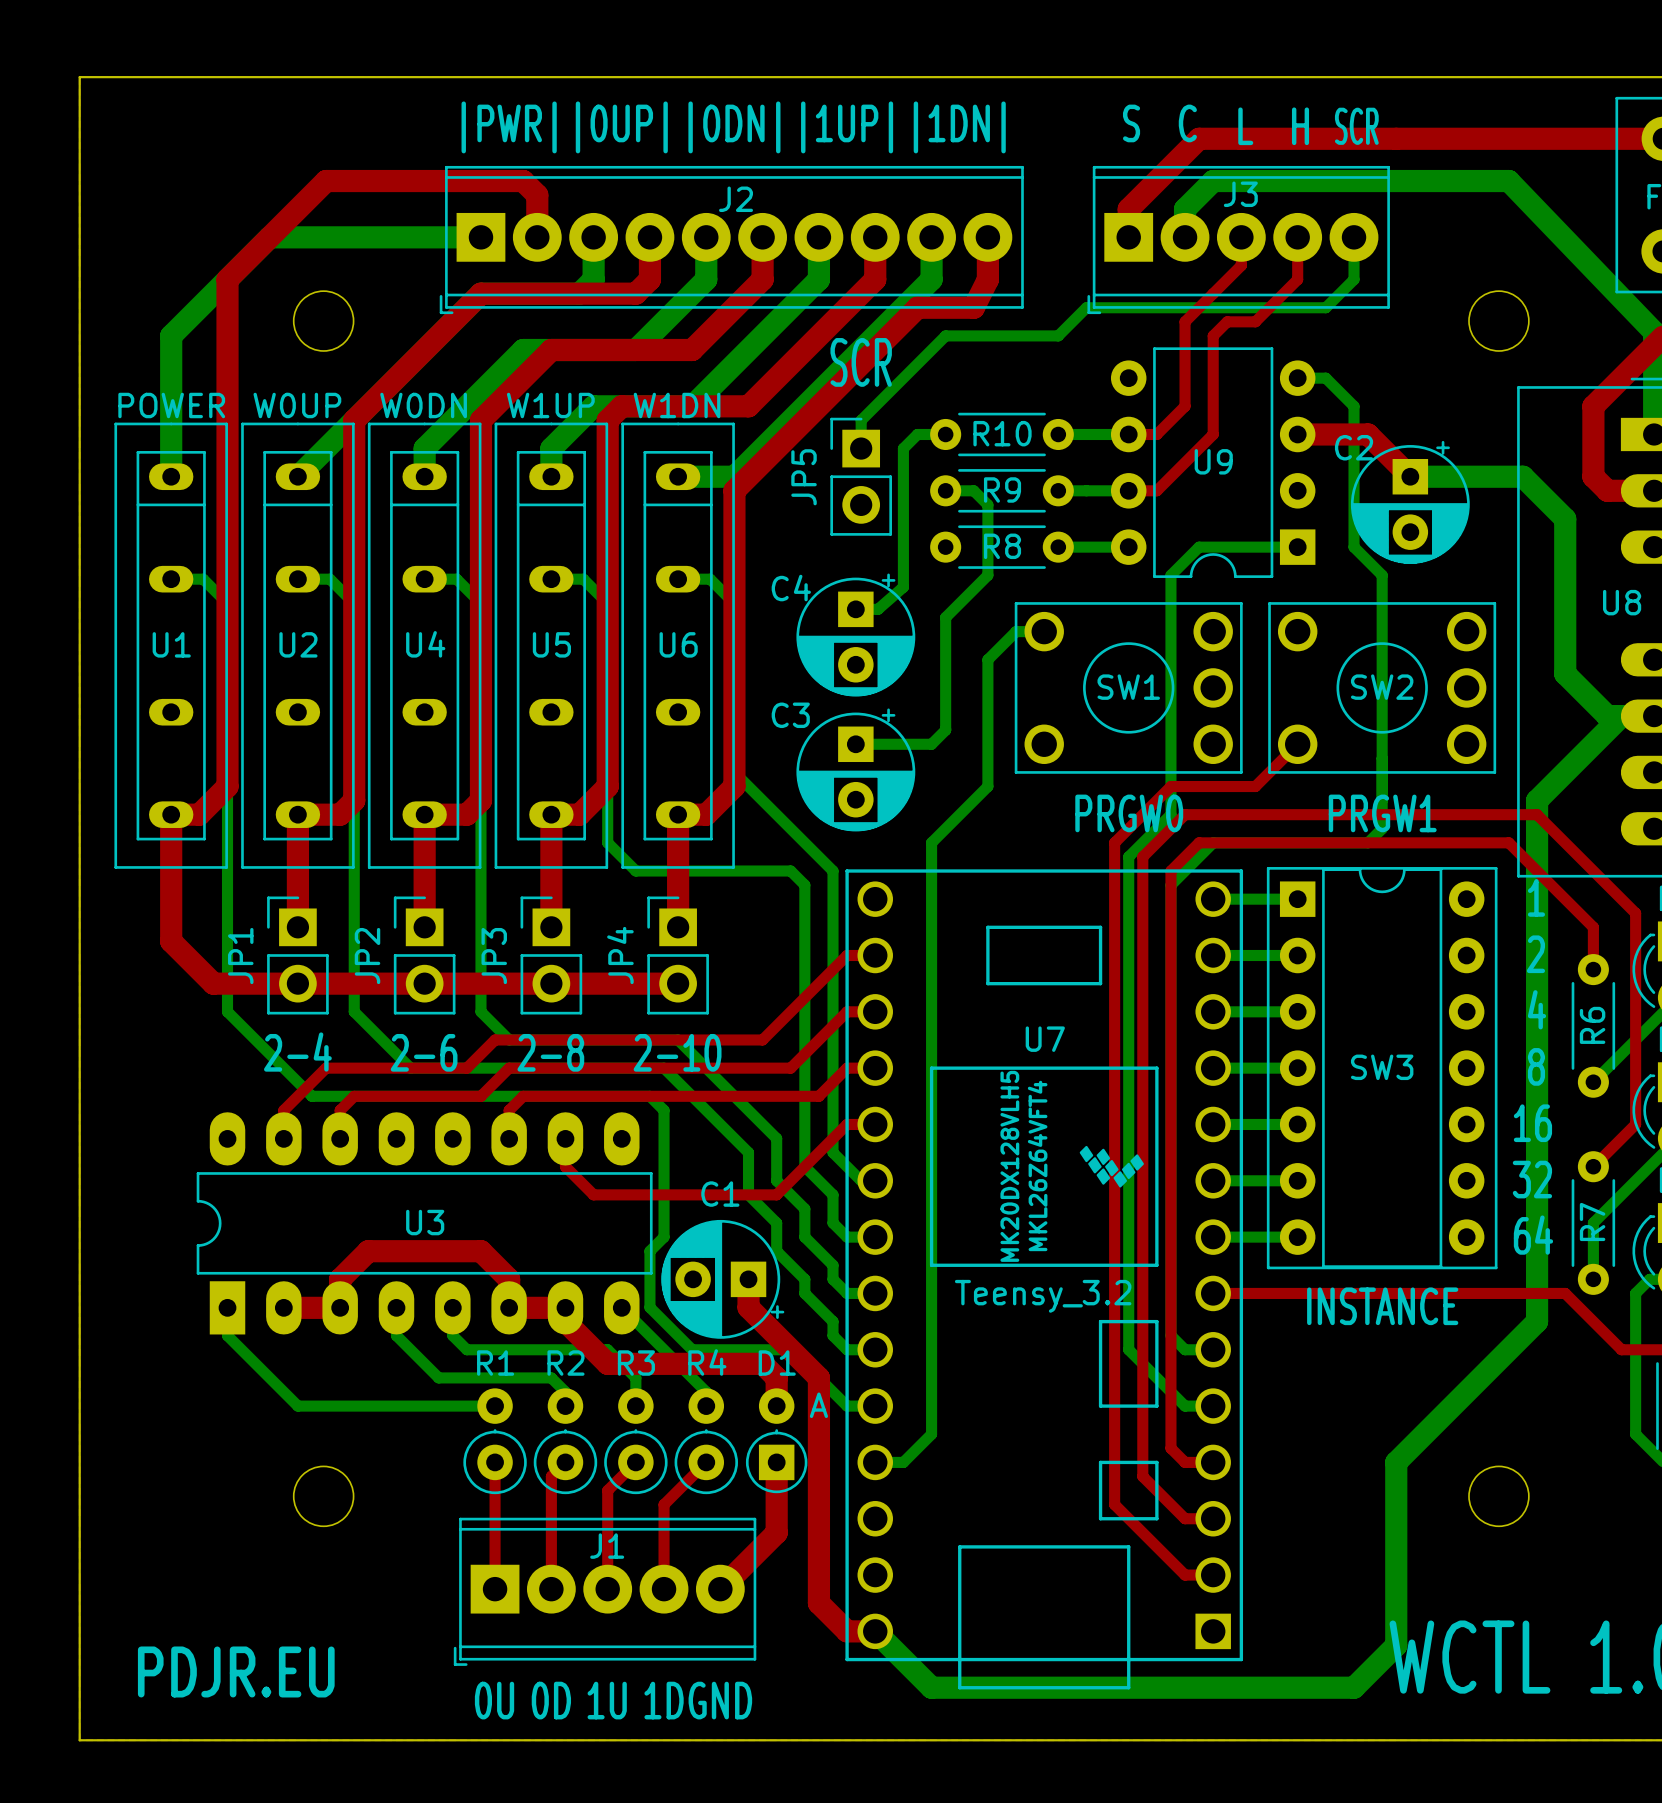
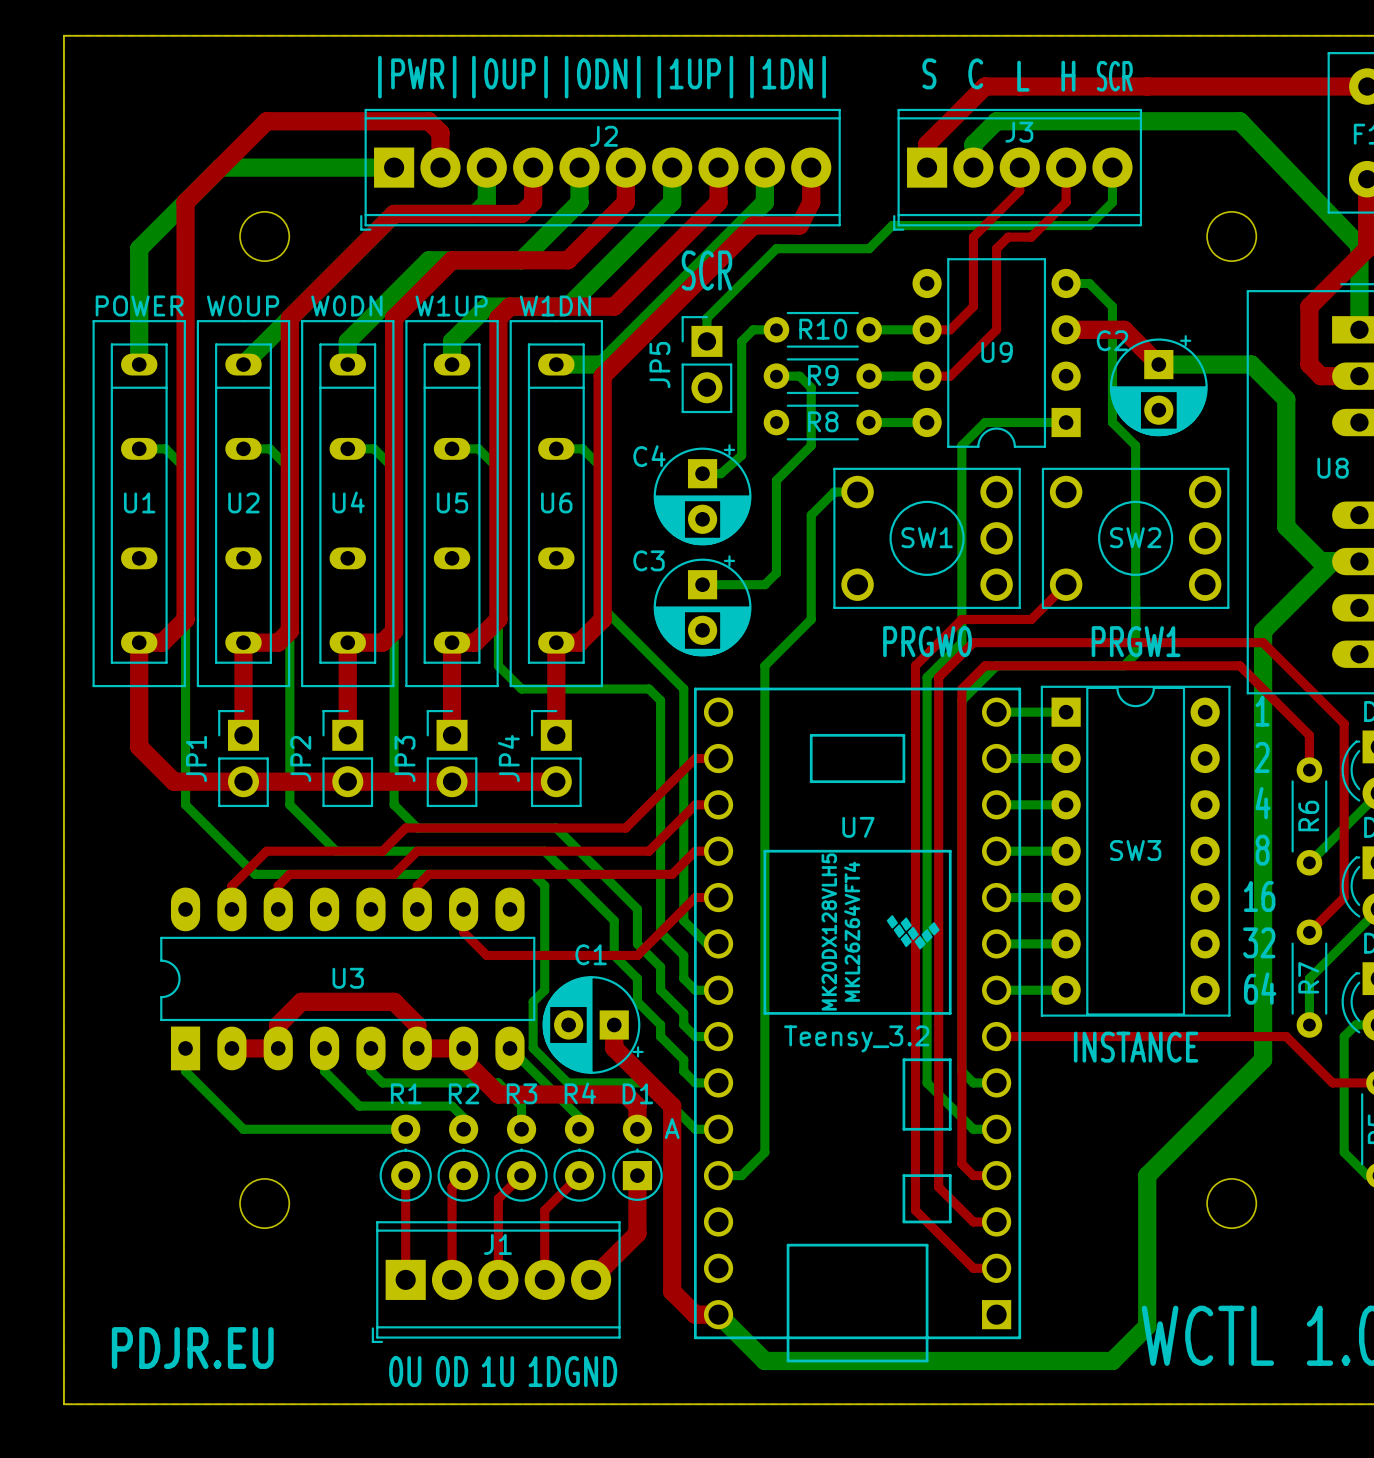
JP1 value: 2-4 (297, 1052) -> none
JP2 value: 2-6 (424, 1052) -> none
JP3 value: 2-8 (550, 1052) -> none
JP4 value: 2-10 (677, 1052) -> none

